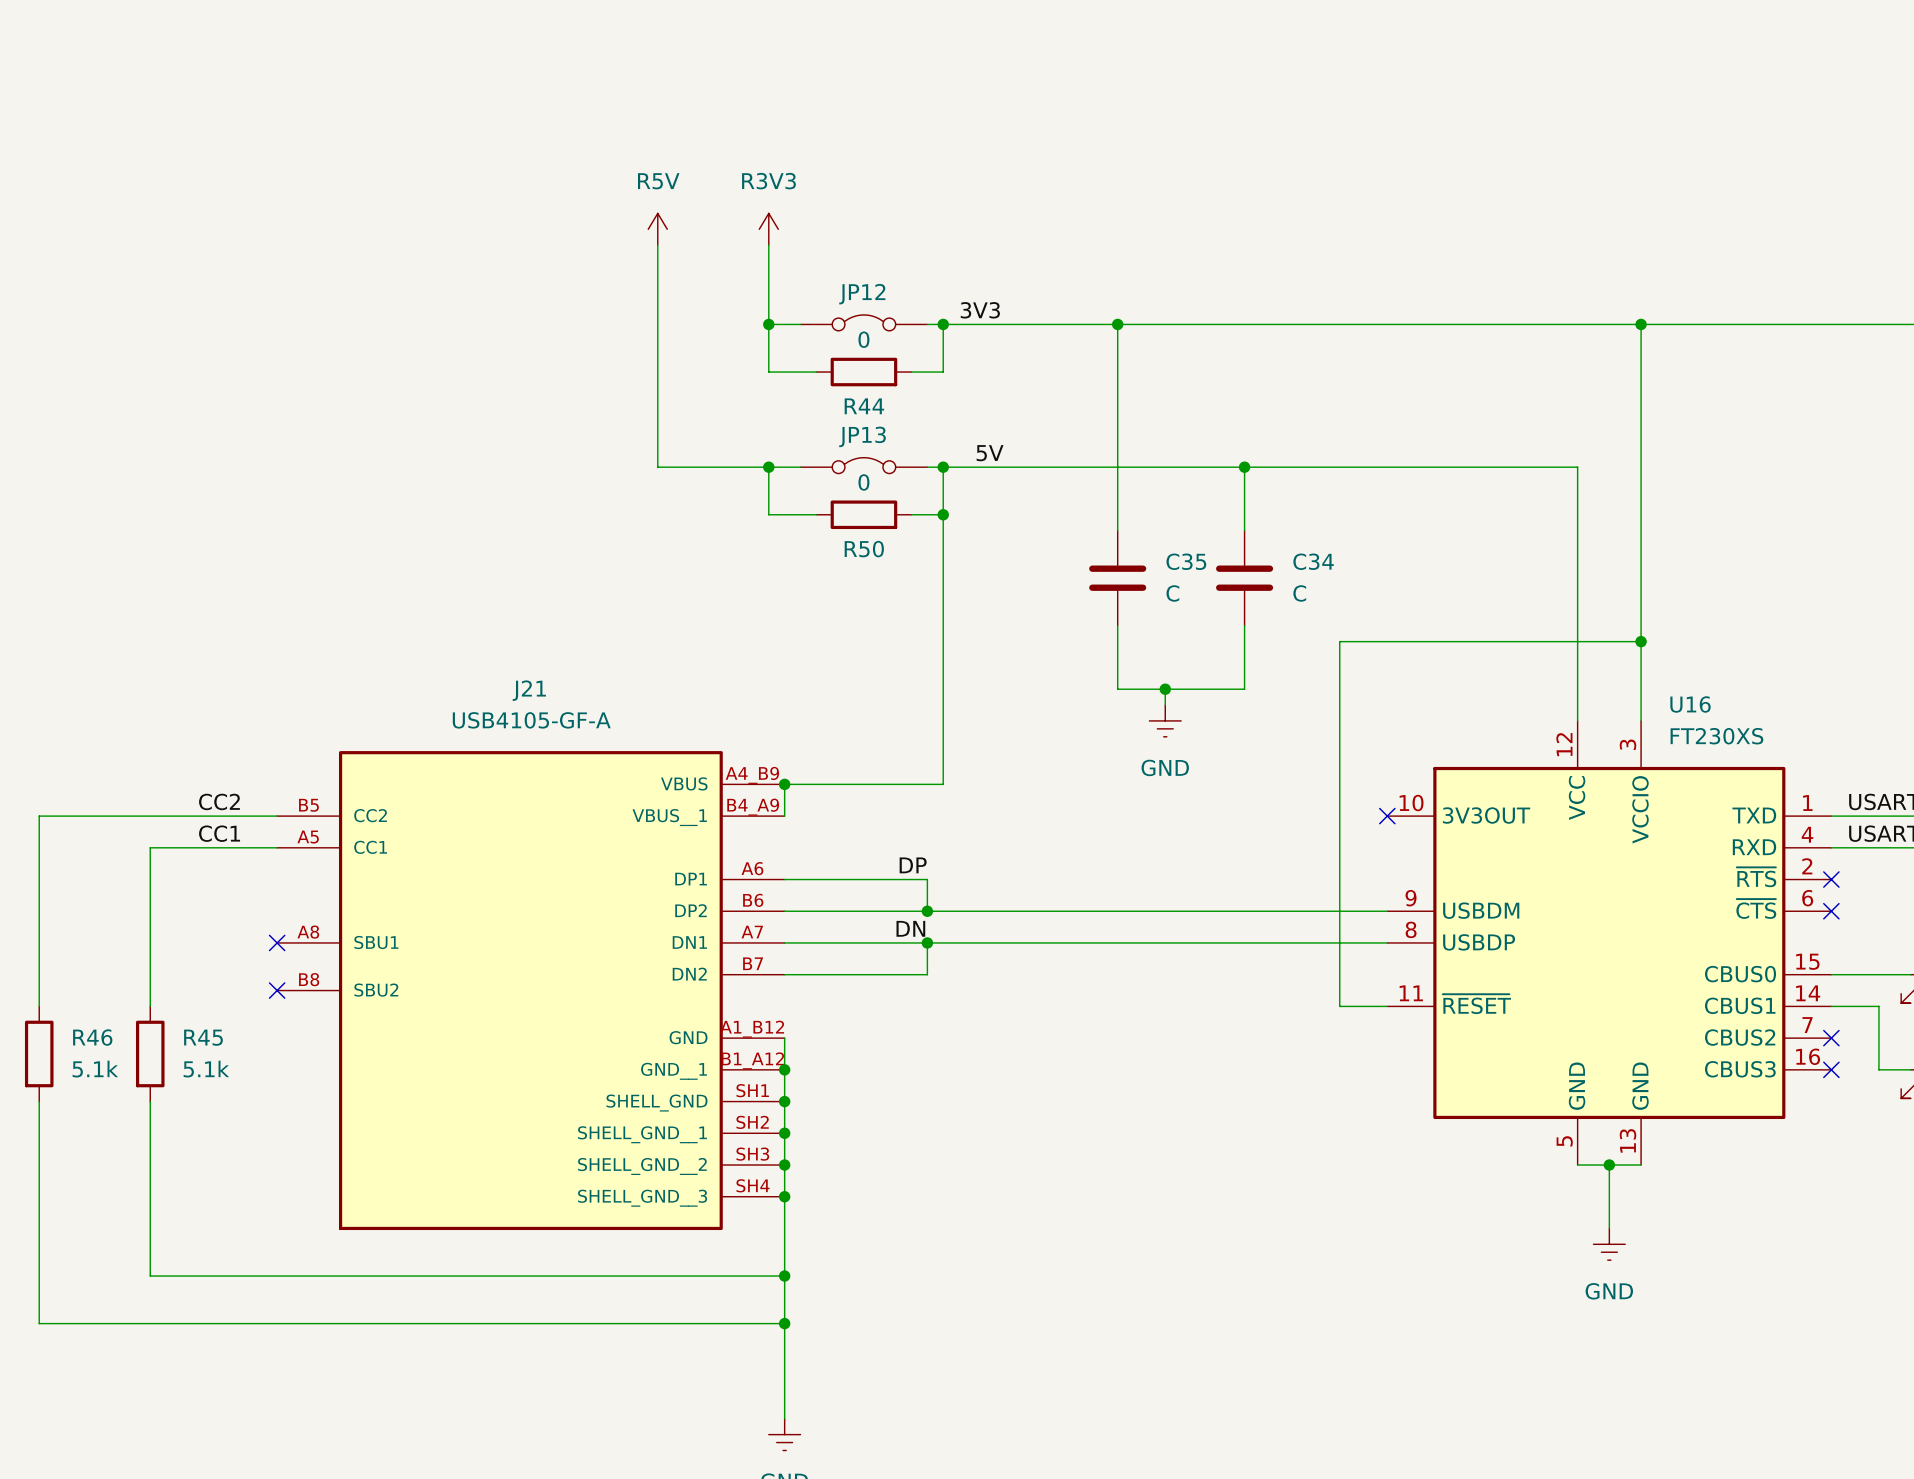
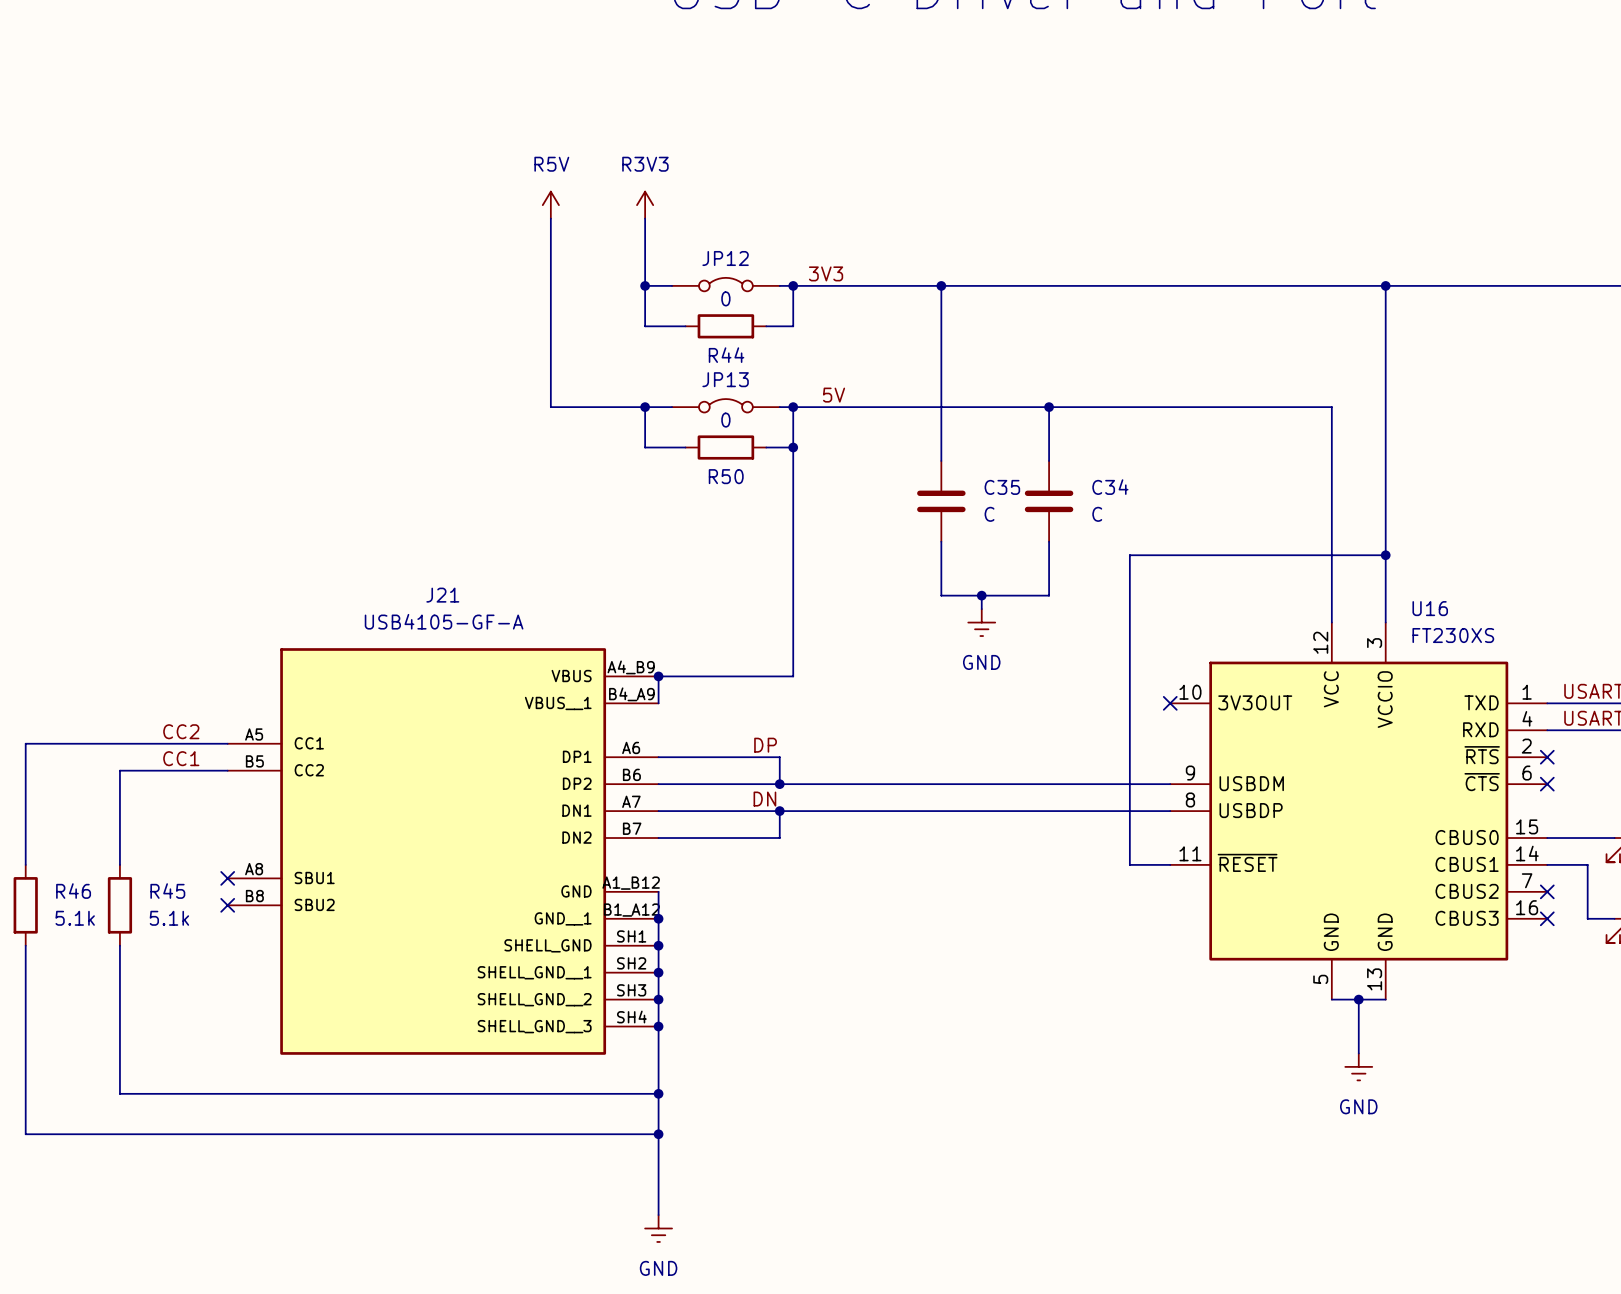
J21 symbol: [277, 751, 785, 1231] -> [227, 648, 659, 1055]
label position: CC2 (219, 801) -> CC2 (181, 731)
wire: (277, 816) (39, 816) (39, 863) -> (227, 743) (25, 743)
label position: CC1 (219, 833) -> CC1 (181, 758)
wire: (277, 847) (150, 847) (150, 895) -> (227, 770) (119, 770)
no-connect mark: (277, 942) -> none
no-connect mark: (277, 990) -> none
no-connect mark: none -> (227, 878)
no-connect mark: none -> (227, 905)

